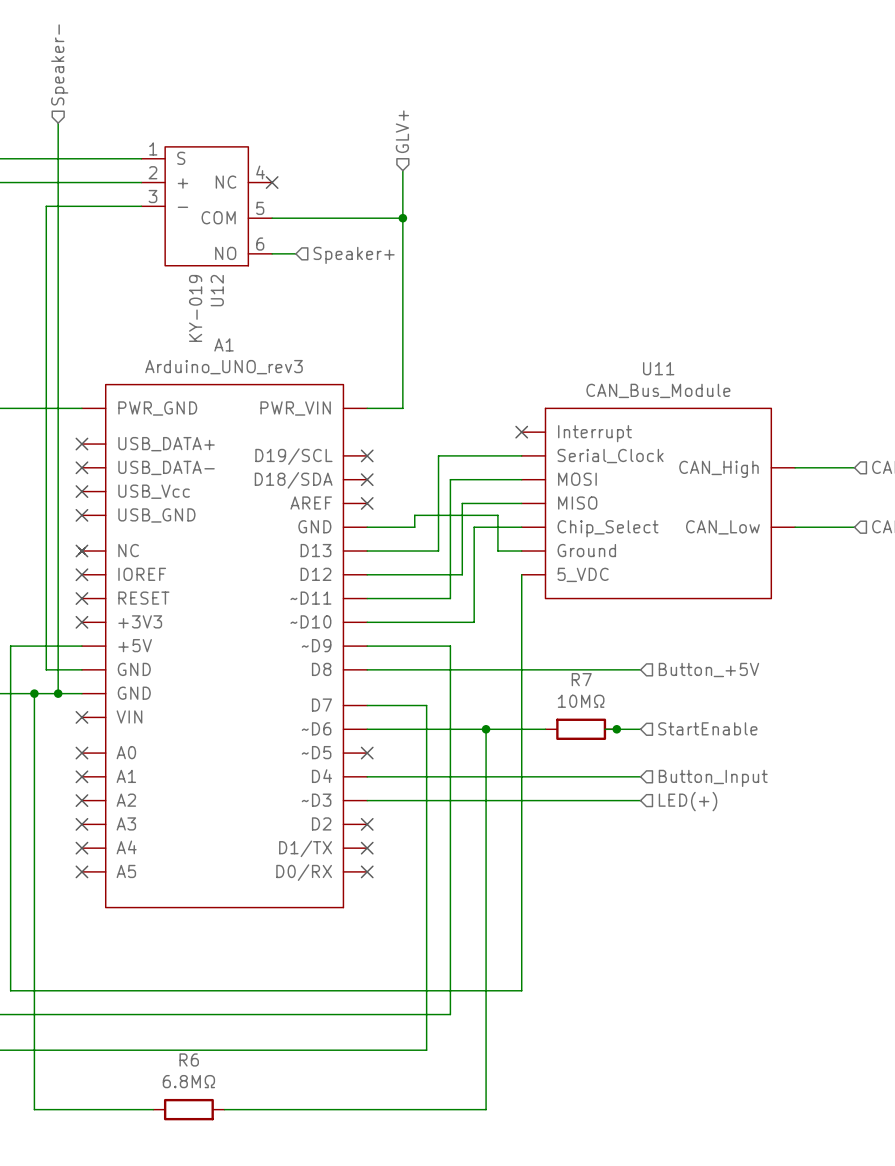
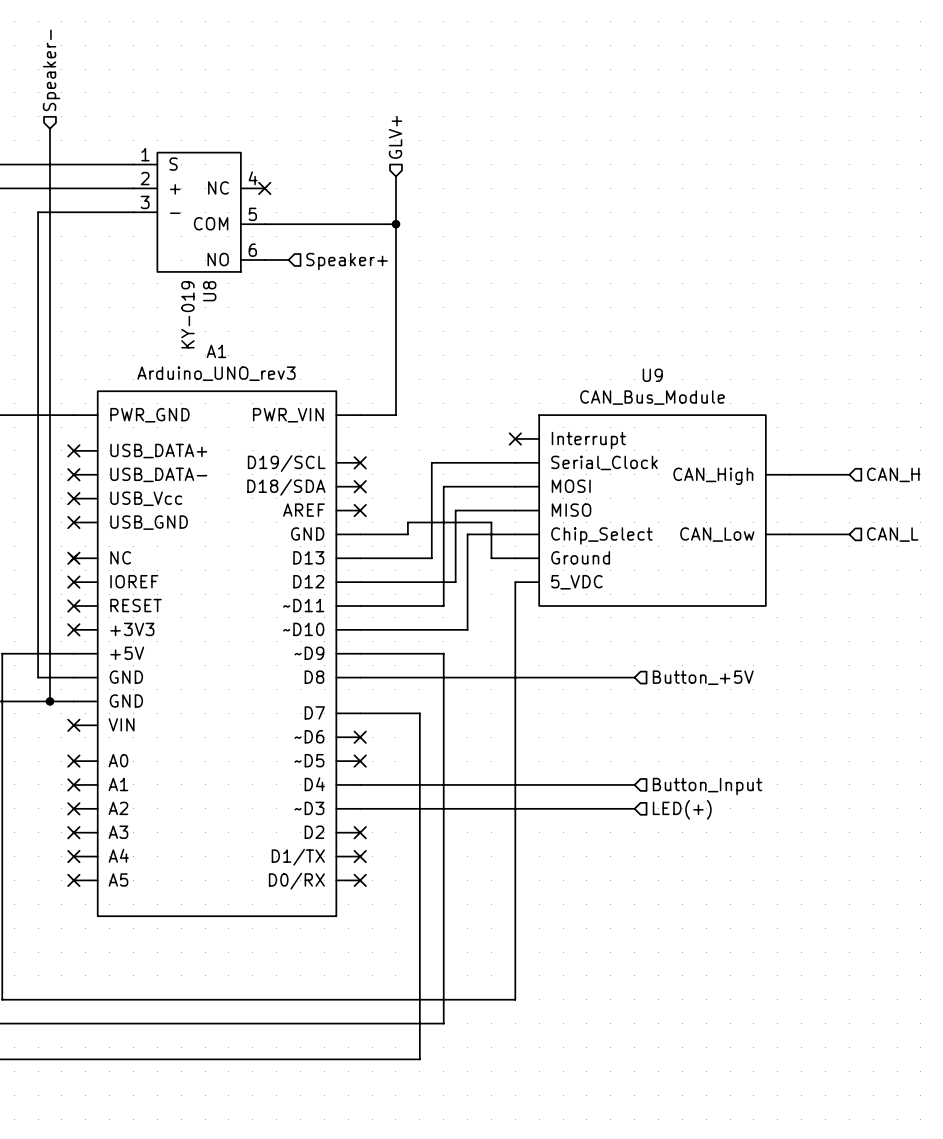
U12 name: U12 (217, 290) -> U8 (209, 291)
U11 name: U11 (658, 368) -> U9 (652, 375)
wire: (34, 693) (34, 1109) (153, 1109) -> none
junction: (34, 693) -> none
hierarchical label: StartEnable (707, 728) -> none
wire: (367, 729) (545, 729) -> none
no-connect mark: none -> (360, 737)
wire: (486, 729) (486, 1109) (224, 1109) -> none
junction: (486, 729) -> none
R7: 10MΩ (581, 729) -> none
wire: (604, 729) (640, 729) -> none
junction: (616, 729) -> none
R6: 6.8MΩ (188, 1109) -> none

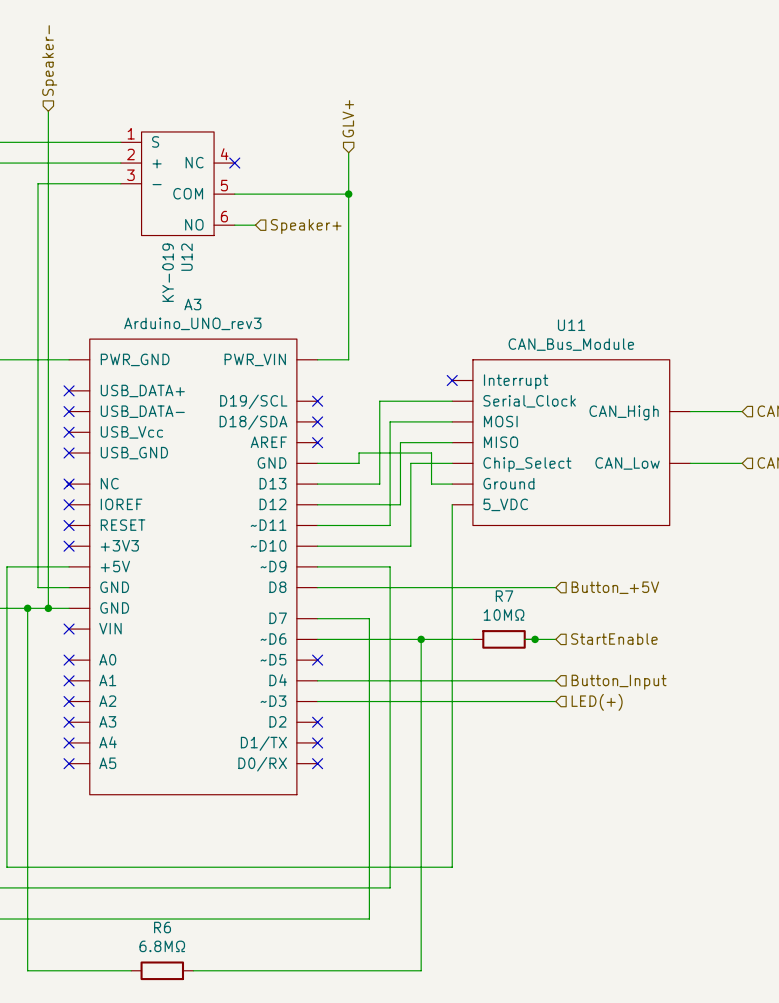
U8 name: U8 (209, 291) -> U12 (186, 257)
A1 name: A1 (216, 351) -> A3 (192, 304)
U9 name: U9 (652, 375) -> U11 (571, 325)
wire: none -> (27, 608) (27, 970) (131, 970)
junction: none -> (27, 608)
hierarchical label: none -> StartEnable (614, 639)
wire: none -> (317, 639) (472, 639)
no-connect mark: (360, 737) -> none
wire: none -> (421, 639) (421, 970) (193, 970)
junction: none -> (421, 639)
R7: none -> 10MΩ (504, 639)
wire: none -> (524, 639) (555, 639)
junction: none -> (535, 639)
R6: none -> 6.8MΩ (162, 970)

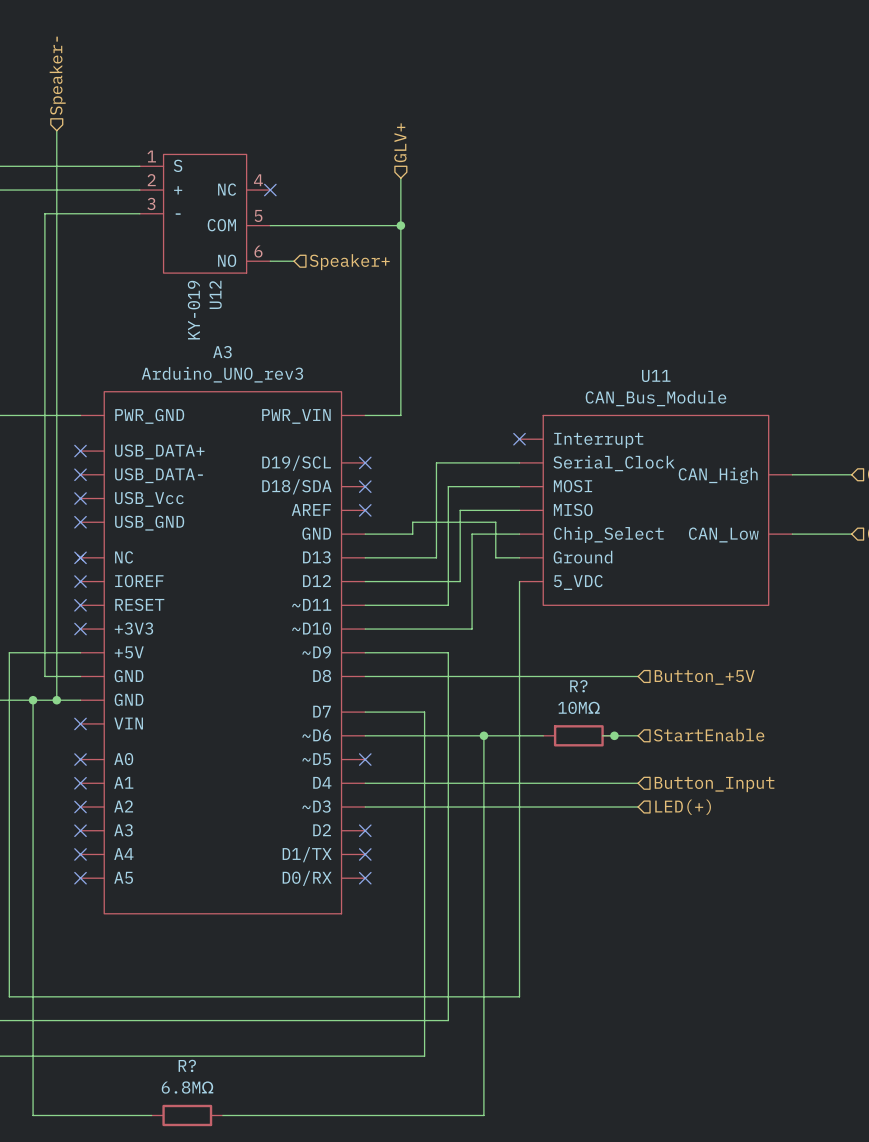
R7 name: R7 (504, 596) -> R? (578, 686)
R6 name: R6 (162, 927) -> R? (187, 1065)

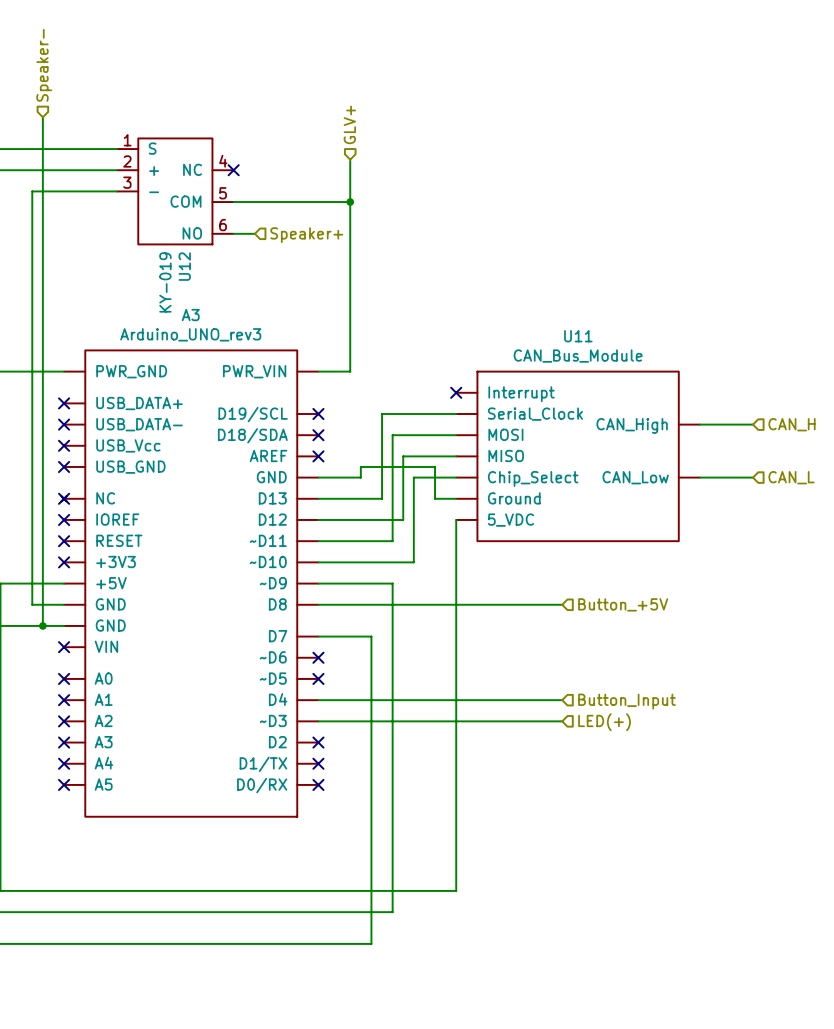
wire: (33, 700) (33, 1115) (151, 1115) -> none
junction: (33, 700) -> none
wire: (365, 735) (543, 735) -> none
no-connect mark: none -> (318, 657)
wire: (483, 735) (483, 1115) (222, 1115) -> none
junction: (483, 735) -> none
R?: 10MΩ (578, 735) -> none
wire: (602, 735) (638, 735) -> none
junction: (614, 735) -> none
hierarchical label: StartEnable (709, 735) -> none
R?: 6.8MΩ (187, 1115) -> none

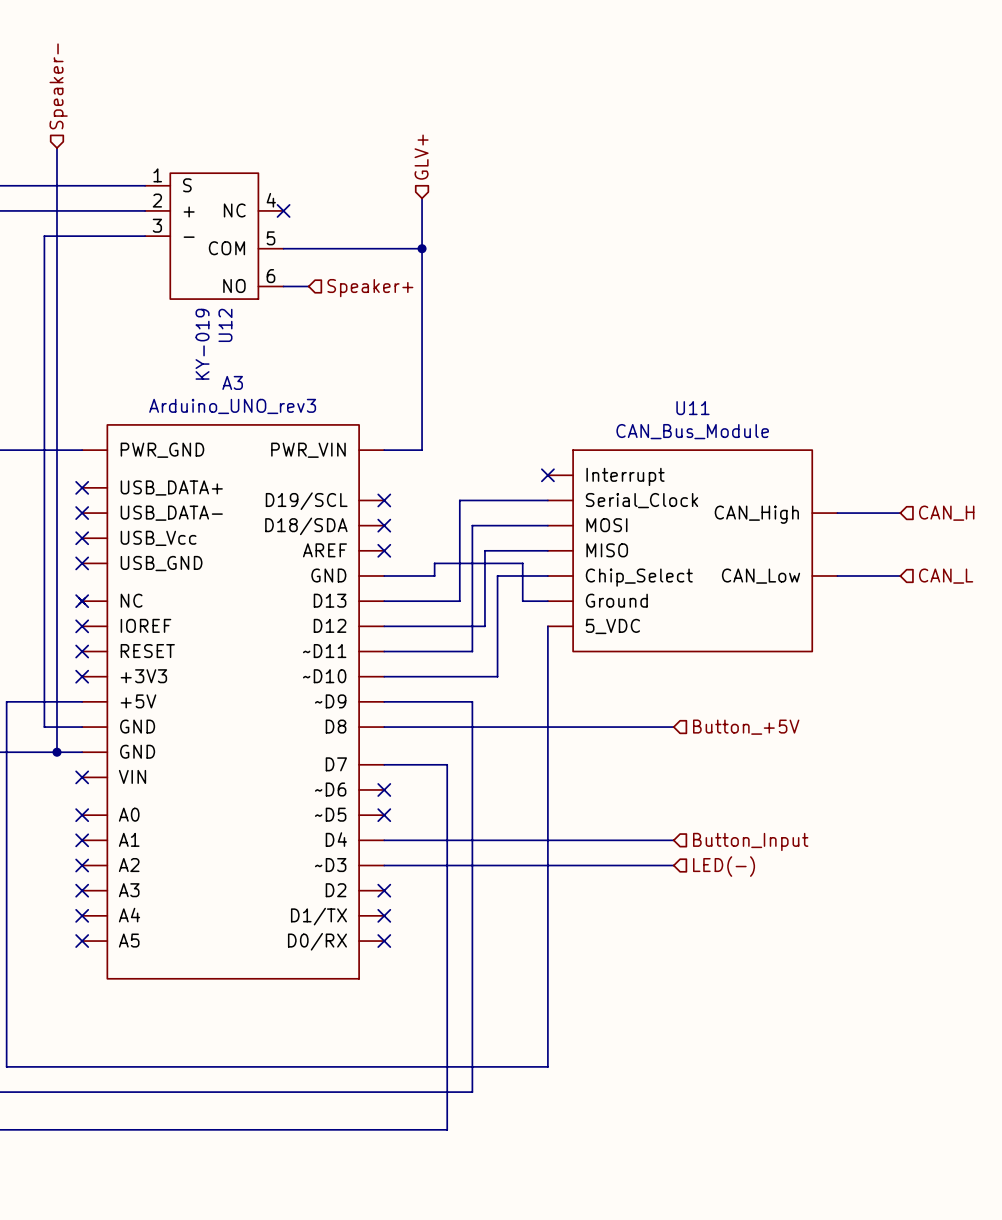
hierarchical label: LED(+) (604, 722) -> LED(-) (724, 866)

